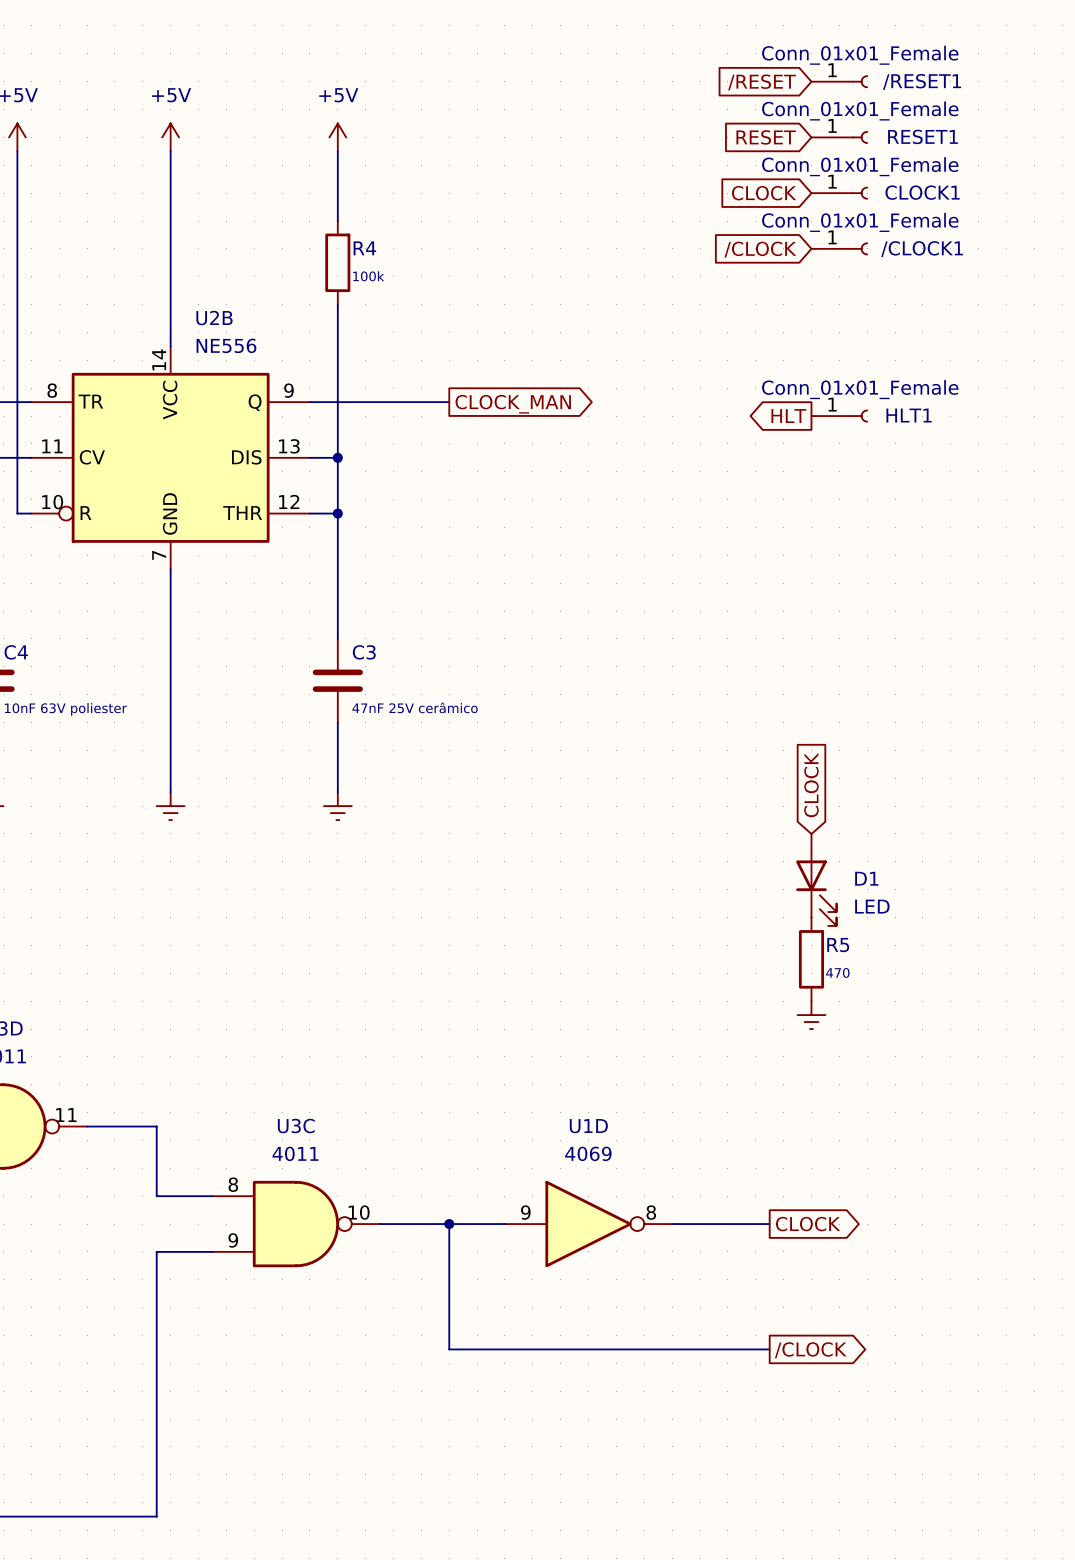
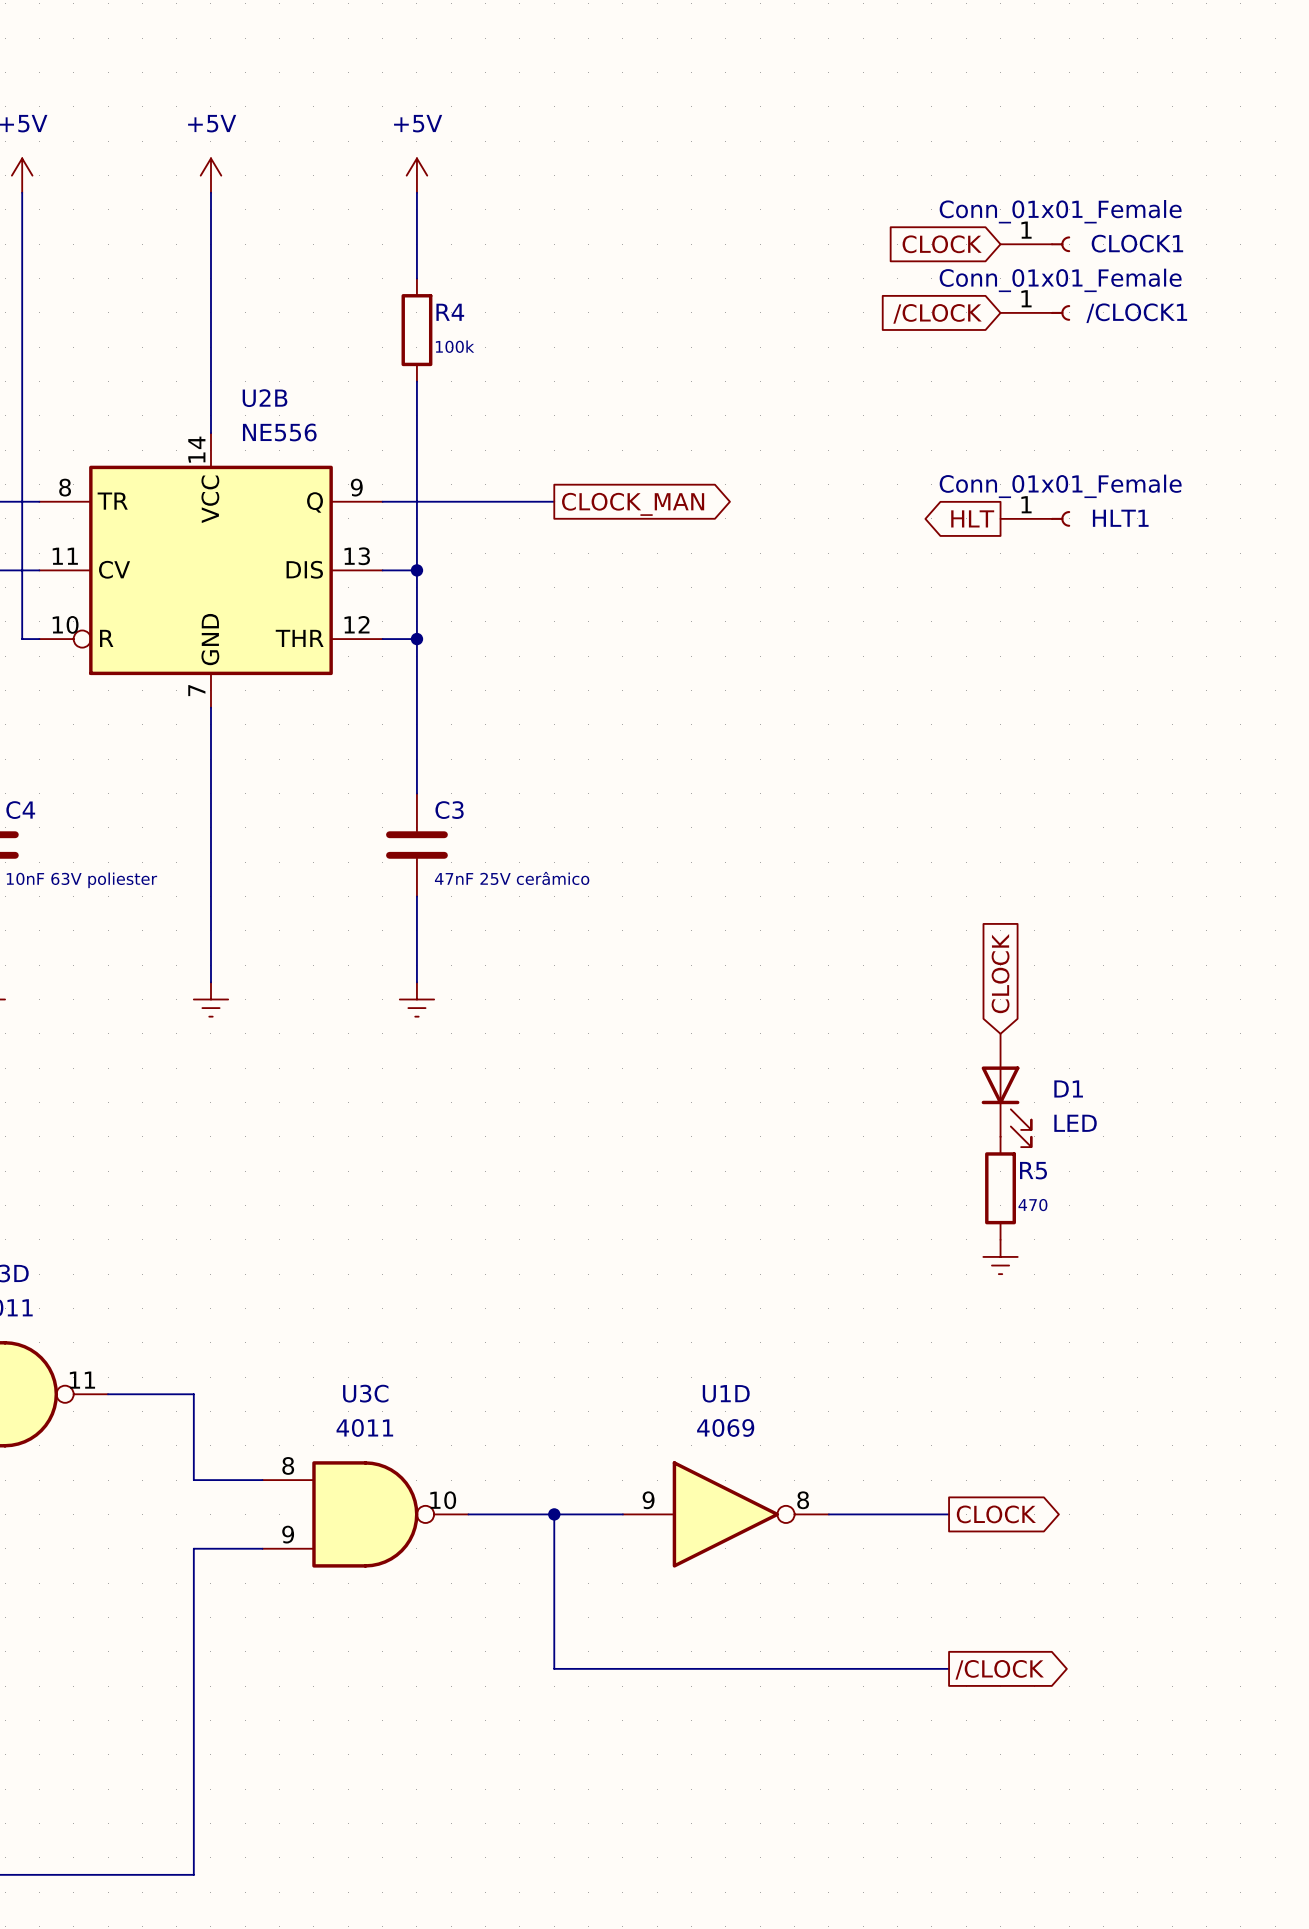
/RESET1: Conn_01x01_Female (839, 81) -> none
global label: /RESET (762, 82) -> none
global label: RESET (766, 137) -> none
RESET1: Conn_01x01_Female (839, 137) -> none

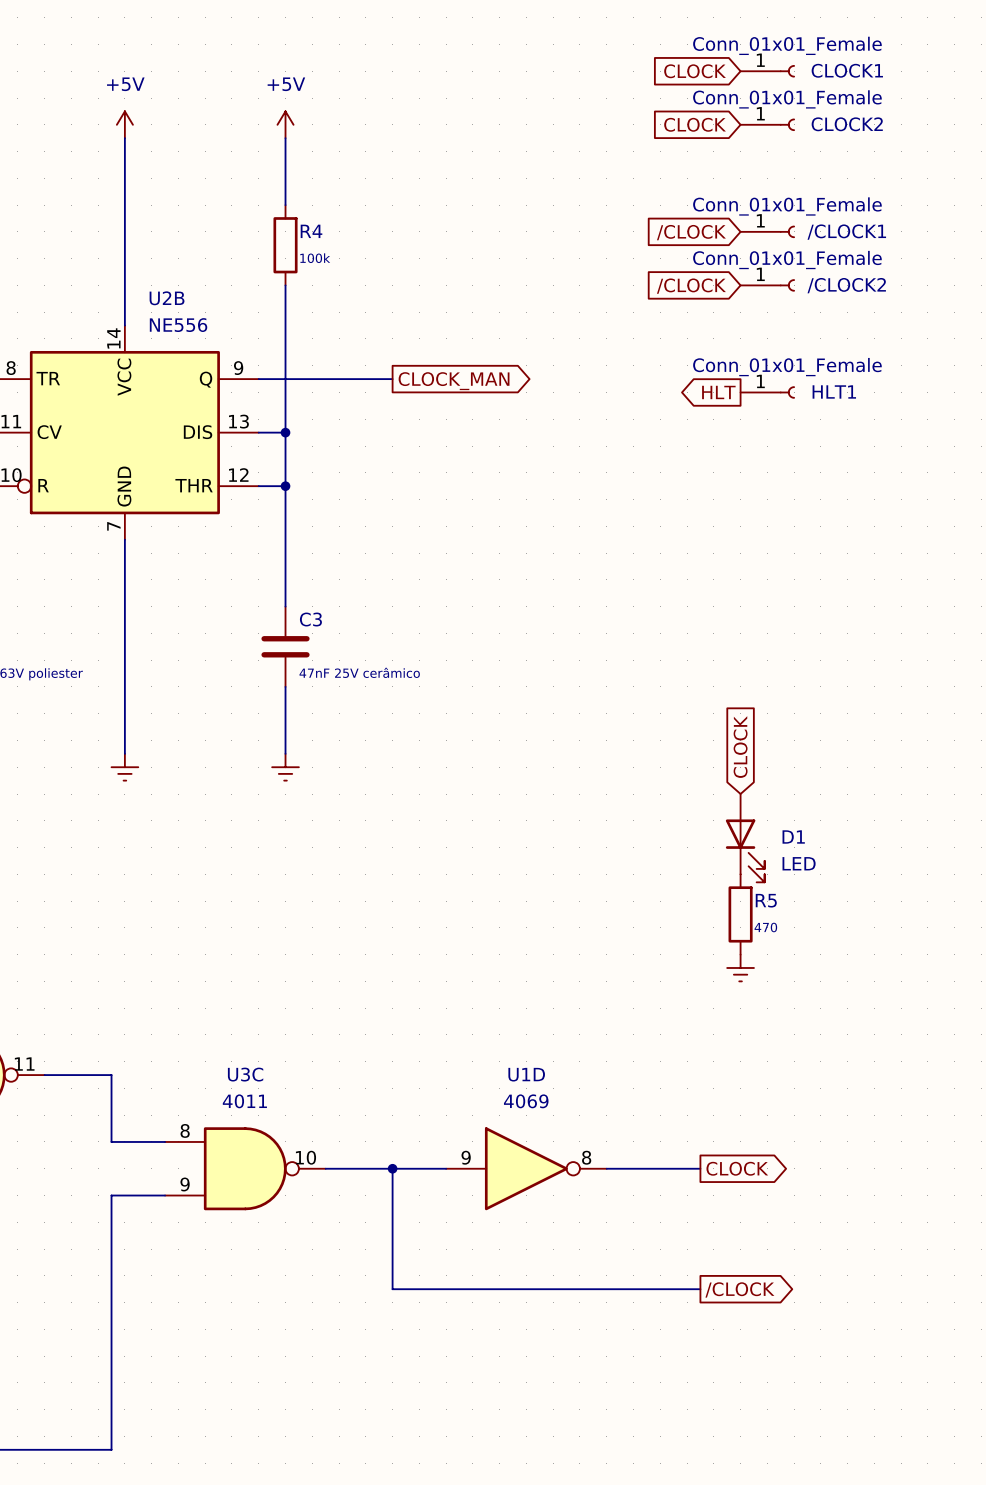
global label: none -> CLOCK (695, 71)
global label: none -> CLOCK (695, 124)
CLOCK2: none -> Conn_01x01_Female (767, 124)
global label: CLOCK (942, 244) -> none
CLOCK1 position: (1035, 244) -> (767, 71)
/CLOCK2: none -> Conn_01x01_Female (767, 285)
global label: none -> /CLOCK (691, 286)

